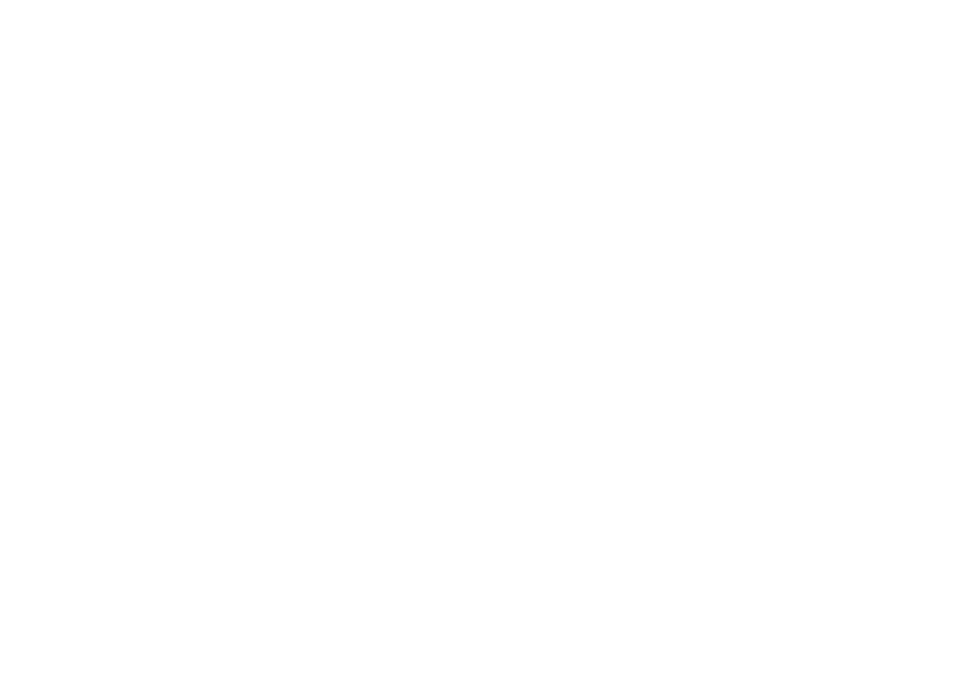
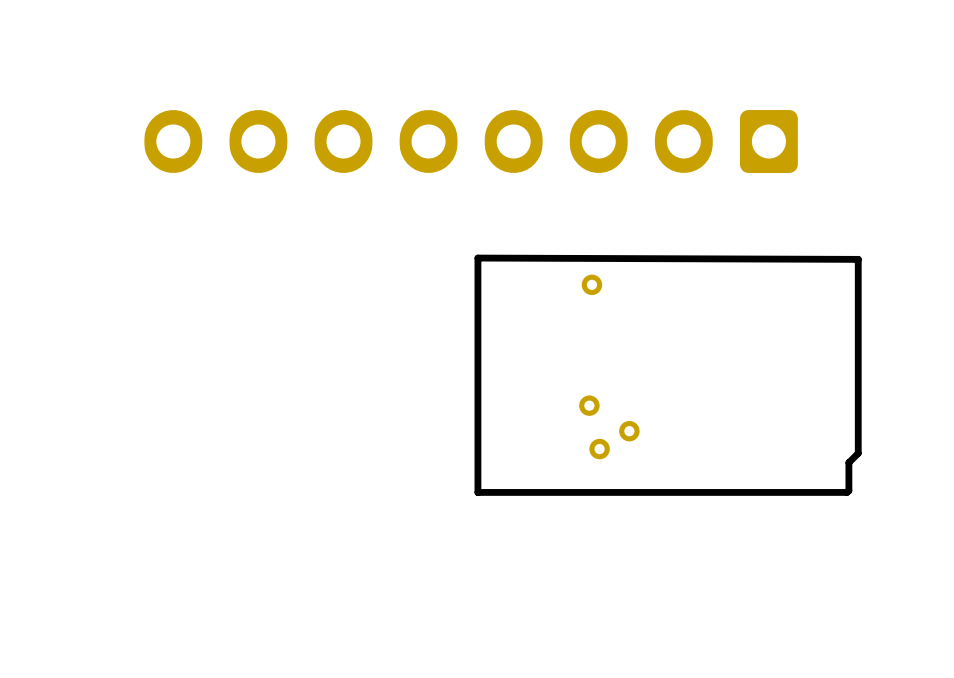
part: none -> (471, 141)
part: none -> (668, 375)

